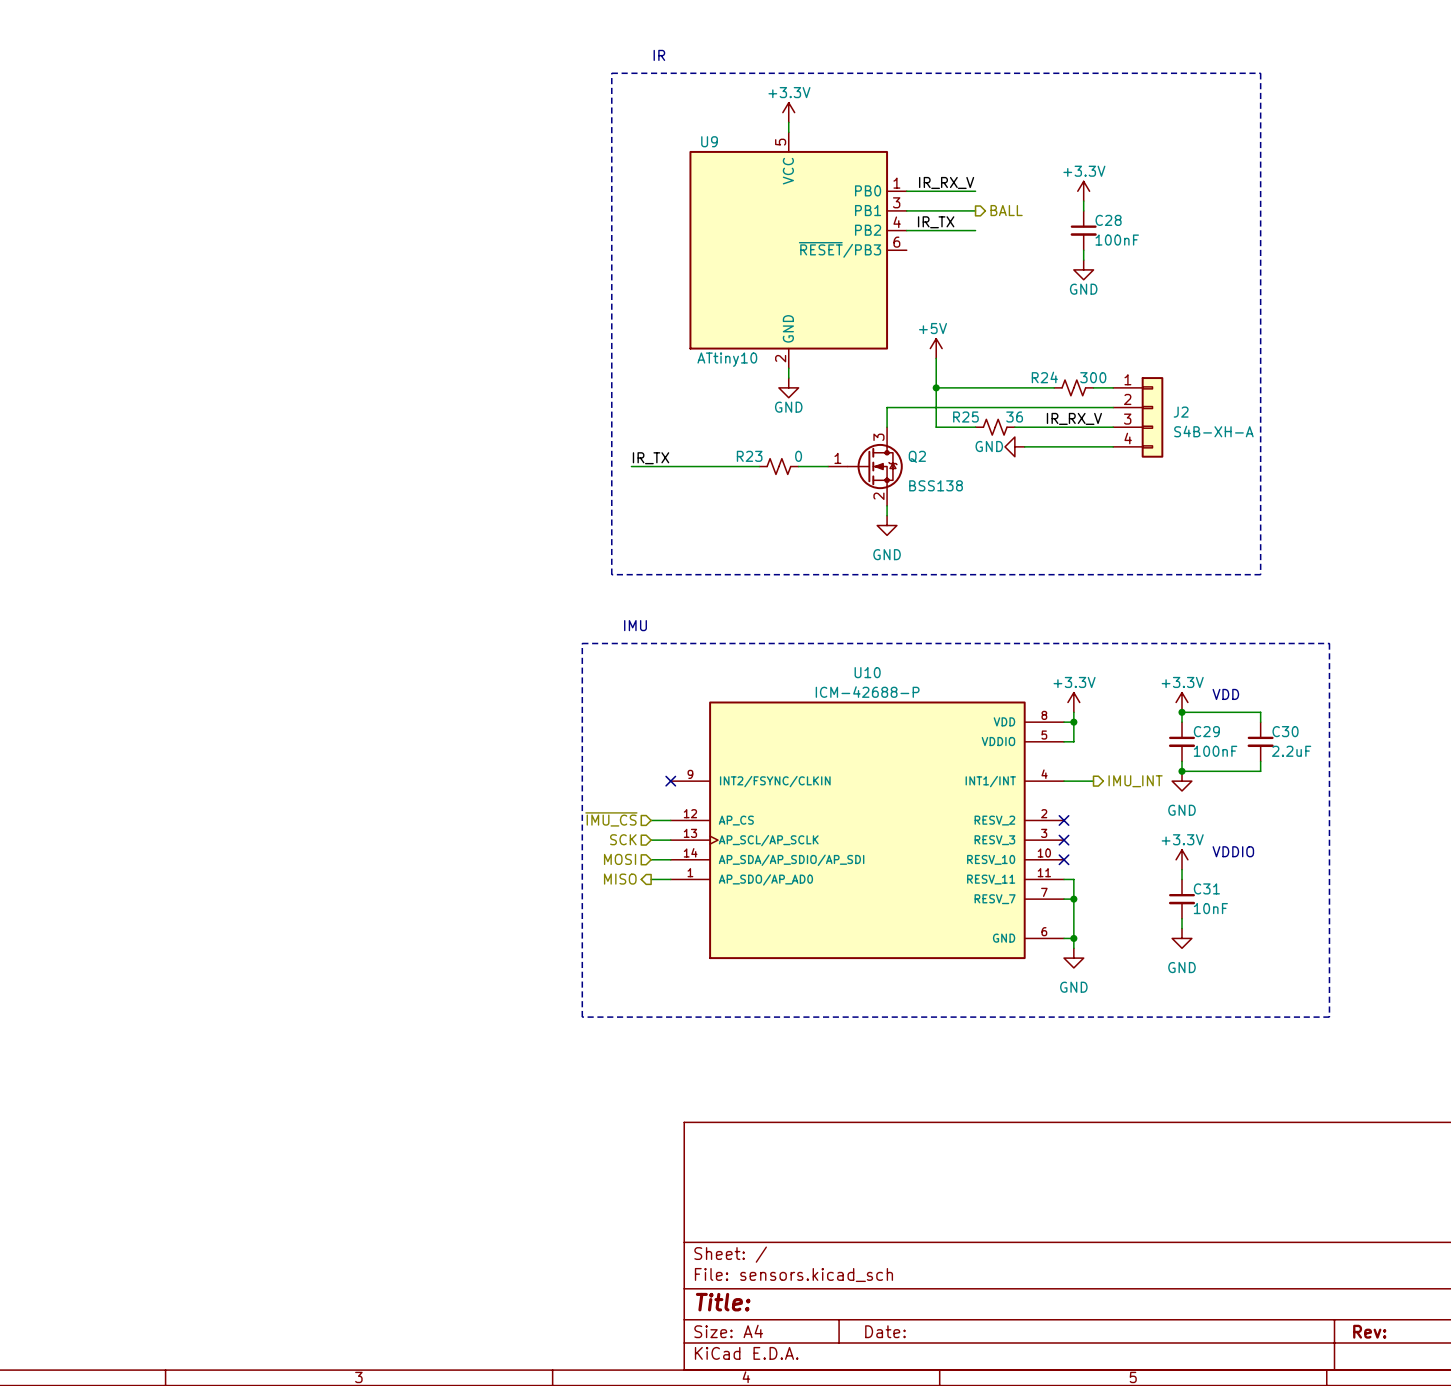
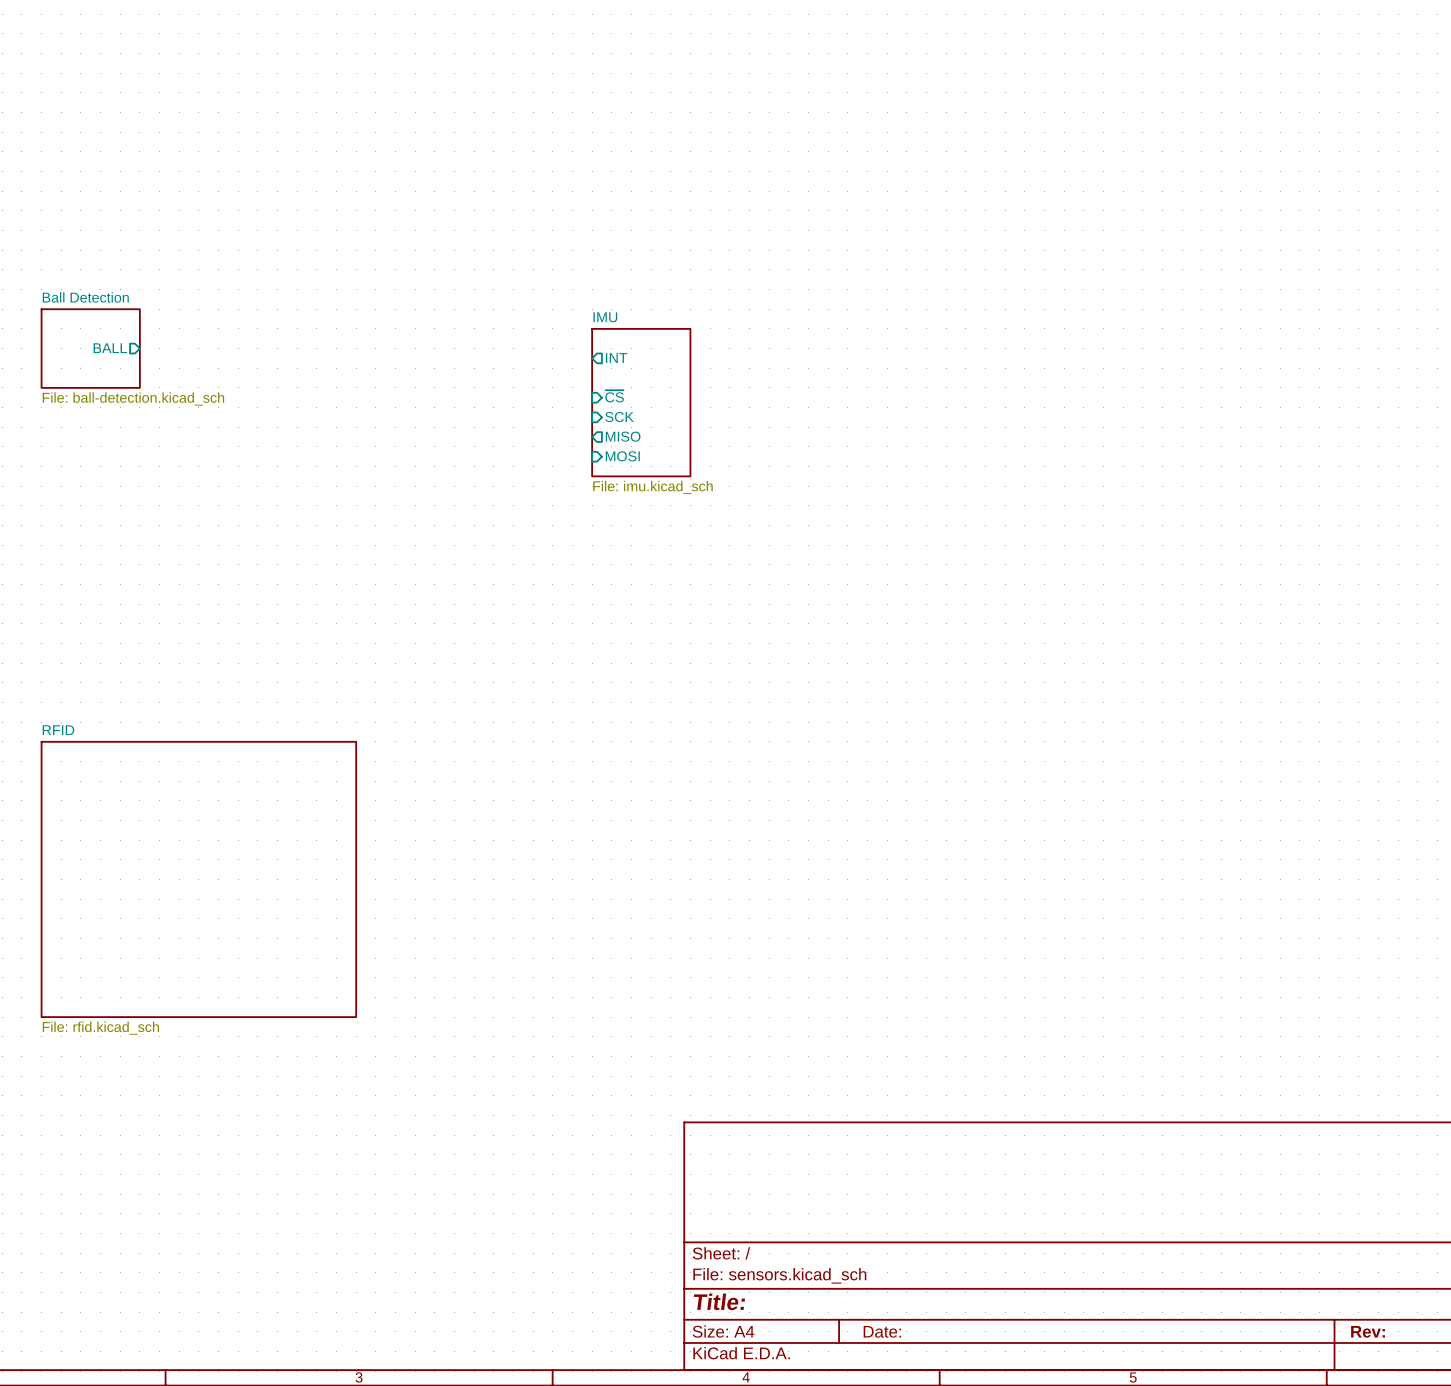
text: IR (659, 55) -> none
line: (611, 73) (1260, 73) (1260, 574) (611, 574) (611, 73) -> none
power symbol: +3.3V (788, 112) -> none
wire: (788, 122) (788, 132) -> none
label: IR_RX_V (946, 182) -> none
wire: (906, 191) (975, 191) -> none
power symbol: +3.3V (1083, 191) -> none
wire: (1083, 201) (1083, 210) -> none
wire: (906, 210) (975, 210) -> none
hierarchical label: BALL (1006, 210) -> none
label: IR_TX (936, 222) -> none
wire: (906, 230) (975, 230) -> none
C28: 100nF (1083, 230) -> none
U9: ATtiny10 (798, 250) -> none
wire: (1083, 250) (1083, 260) -> none
power symbol: GND (1083, 269) -> none
sheet Ball Detection: none -> File: ball-detection.kicad_sch (90, 348)
sheet pin: none -> BALL (110, 348)
power symbol: +5V (936, 348) -> none
sheet pin: none -> INT (616, 358)
wire: (936, 358) (936, 427) (975, 427) -> none
wire: (788, 368) (788, 378) -> none
power symbol: GND (788, 387) -> none
wire: (936, 387) (1054, 387) -> none
junction: (936, 387) -> none
R24: 300 (1073, 387) -> none
wire: (1093, 387) (1113, 387) -> none
sheet pin: none -> ~{CS} (614, 396)
sheet IMU: none -> File: imu.kicad_sch (641, 402)
wire: (1113, 407) (887, 407) (887, 427) -> none
sheet pin: none -> SCK (619, 417)
J2: S4B-XH-A (1138, 417) -> none
label: IR_RX_V (1074, 418) -> none
R25: 36 (995, 427) -> none
wire: (1014, 427) (1113, 427) -> none
sheet pin: none -> MISO (623, 436)
power symbol: GND (1014, 446) -> none
wire: (1024, 446) (1113, 446) -> none
sheet pin: none -> MOSI (622, 456)
label: IR_TX (651, 458) -> none
wire: (631, 466) (759, 466) -> none
R23: 0 (778, 466) -> none
wire: (798, 466) (828, 466) -> none
Q2: BSS138 (865, 466) -> none
wire: (887, 505) (887, 515) -> none
power symbol: GND (887, 525) -> none
text: IMU (635, 625) -> none
line: (582, 643) (1329, 643) (1329, 1017) (582, 1017) (582, 643) -> none
text: VDD (1225, 694) -> none
power symbol: +3.3V (1073, 702) -> none
power symbol: +3.3V (1182, 702) -> none
wire: (1073, 712) (1073, 741) (1064, 741) -> none
junction: (1182, 712) -> none
wire: (1064, 722) (1073, 722) -> none
junction: (1073, 722) -> none
wire: (1182, 722) (1182, 712) (1260, 712) (1260, 722) -> none
C29: 100nF (1182, 741) -> none
C30: 2.2uF (1260, 741) -> none
wire: (1182, 761) (1182, 771) (1260, 771) (1260, 761) -> none
junction: (1182, 771) -> none
no-connect mark: (670, 781) -> none
wire: (1064, 781) (1093, 781) -> none
hierarchical label: IMU_INT (1135, 781) -> none
power symbol: GND (1182, 781) -> none
hierarchical label: ~{IMU_CS} (611, 819) -> none
wire: (651, 820) (670, 820) -> none
no-connect mark: (1064, 820) -> none
U10: ICM-42688-P (867, 830) -> none
hierarchical label: SCK (623, 839) -> none
wire: (651, 840) (670, 840) -> none
no-connect mark: (1064, 840) -> none
text: VDDIO (1233, 851) -> none
hierarchical label: MOSI (620, 859) -> none
wire: (651, 859) (670, 859) -> none
no-connect mark: (1064, 859) -> none
power symbol: +3.3V (1182, 859) -> none
wire: (1182, 869) (1182, 879) -> none
sheet RFID: none -> File: rfid.kicad_sch (198, 879)
hierarchical label: MISO (620, 879) -> none
wire: (651, 879) (670, 879) -> none
wire: (1064, 879) (1073, 879) (1073, 948) -> none
wire: (1064, 899) (1073, 899) -> none
junction: (1073, 899) -> none
C31: 10nF (1182, 899) -> none
wire: (1182, 918) (1182, 928) -> none
wire: (1064, 938) (1073, 938) -> none
junction: (1073, 938) -> none
power symbol: GND (1182, 938) -> none
power symbol: GND (1073, 958) -> none

